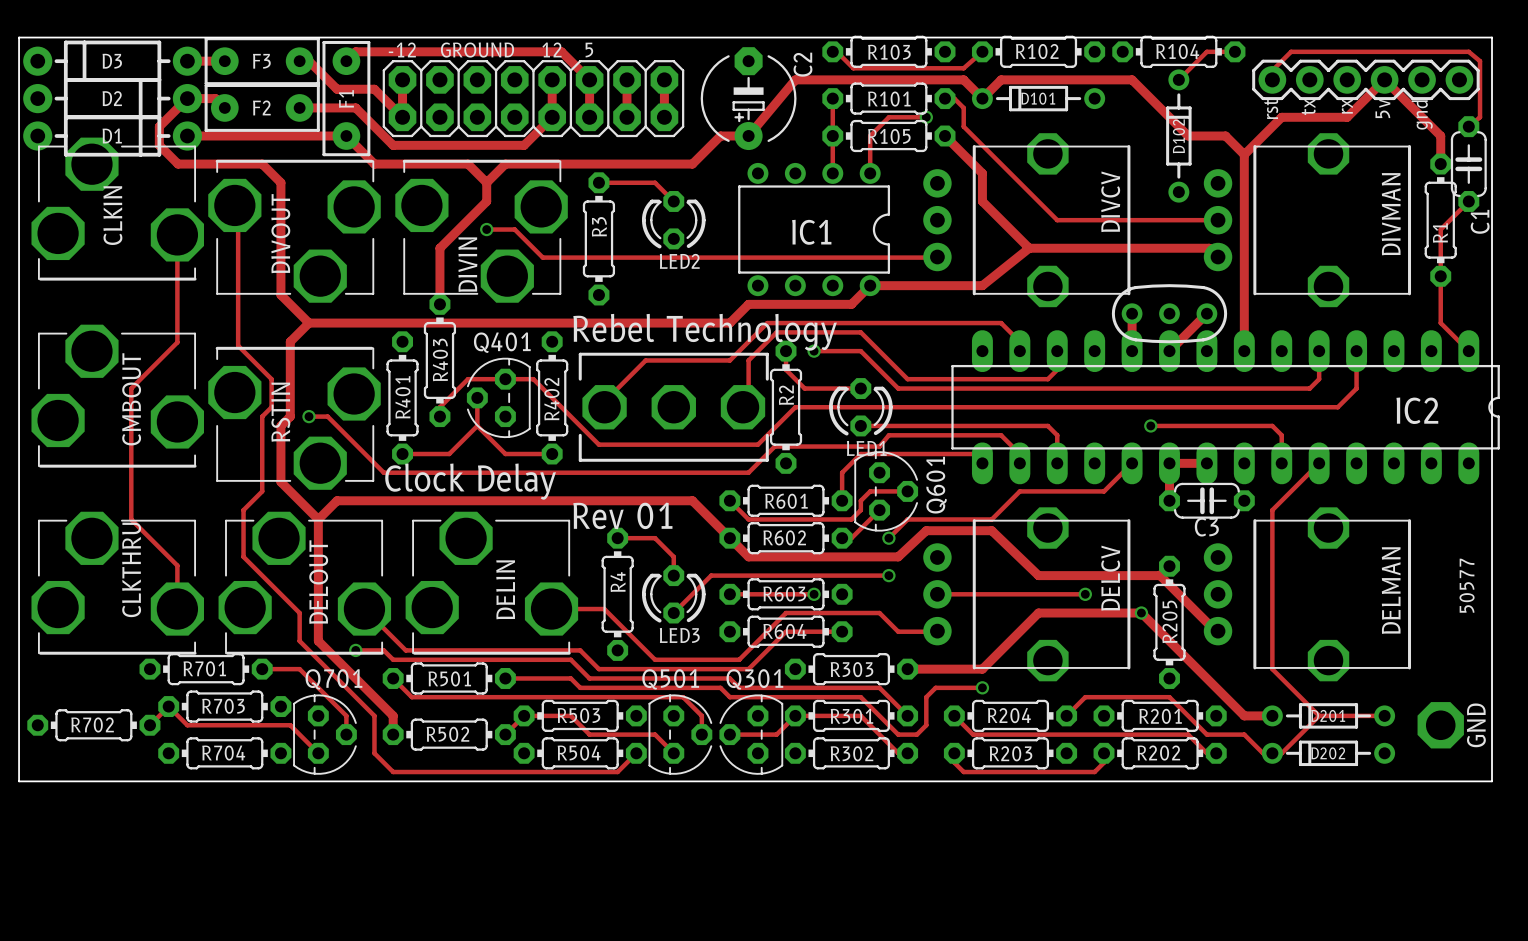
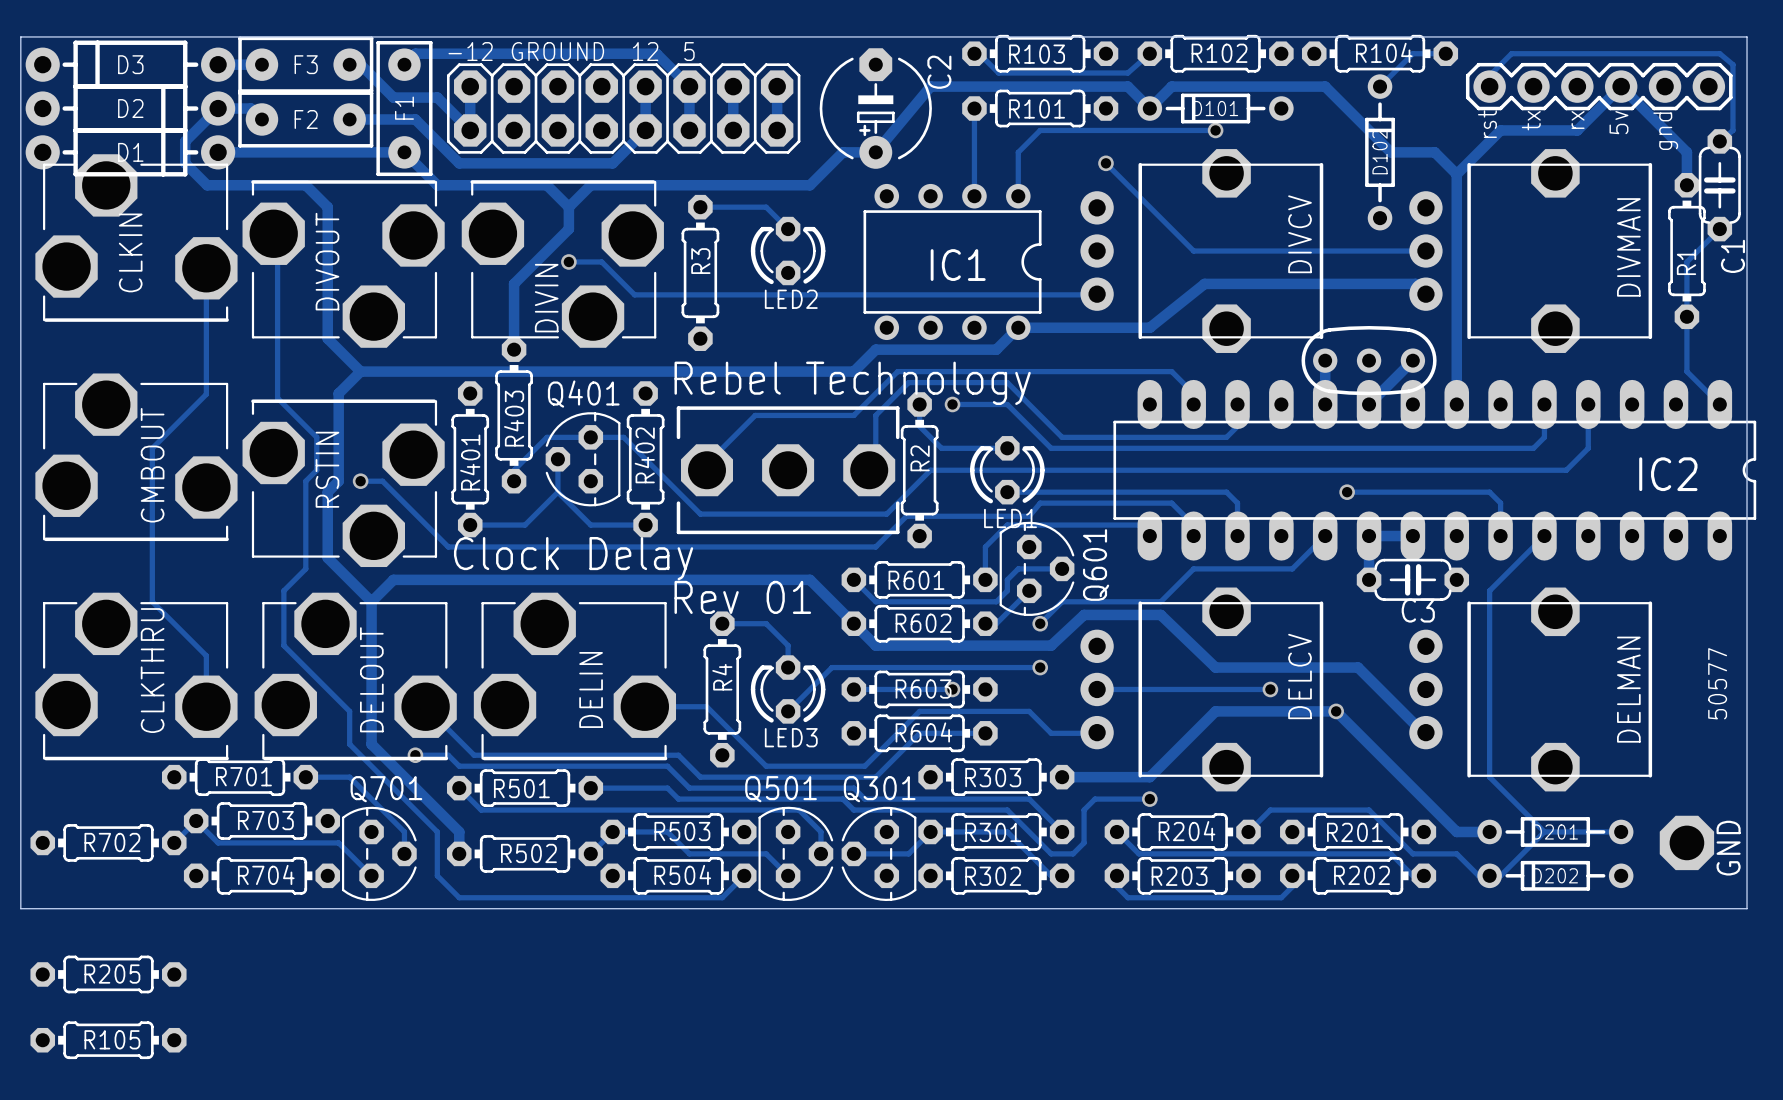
track: (945, 98) (954, 98) (963, 107) (963, 126) (1057, 220) -> (1105, 163) (1193, 251) (1237, 251)
track: none -> (1084, 130) (1215, 130)
via position: (926, 117) -> (1105, 163)
via: none -> (1215, 130)
R105 position: (888, 136) -> (108, 1040)
R105 name position: R105 (889, 136) -> R105 (112, 1039)
track: (945, 136) (982, 173) (982, 201) (1029, 248) -> none
R205 rotation: 0° (1169, 622) -> 90° clockwise (108, 974)
R205 position: (1169, 622) -> (108, 974)

